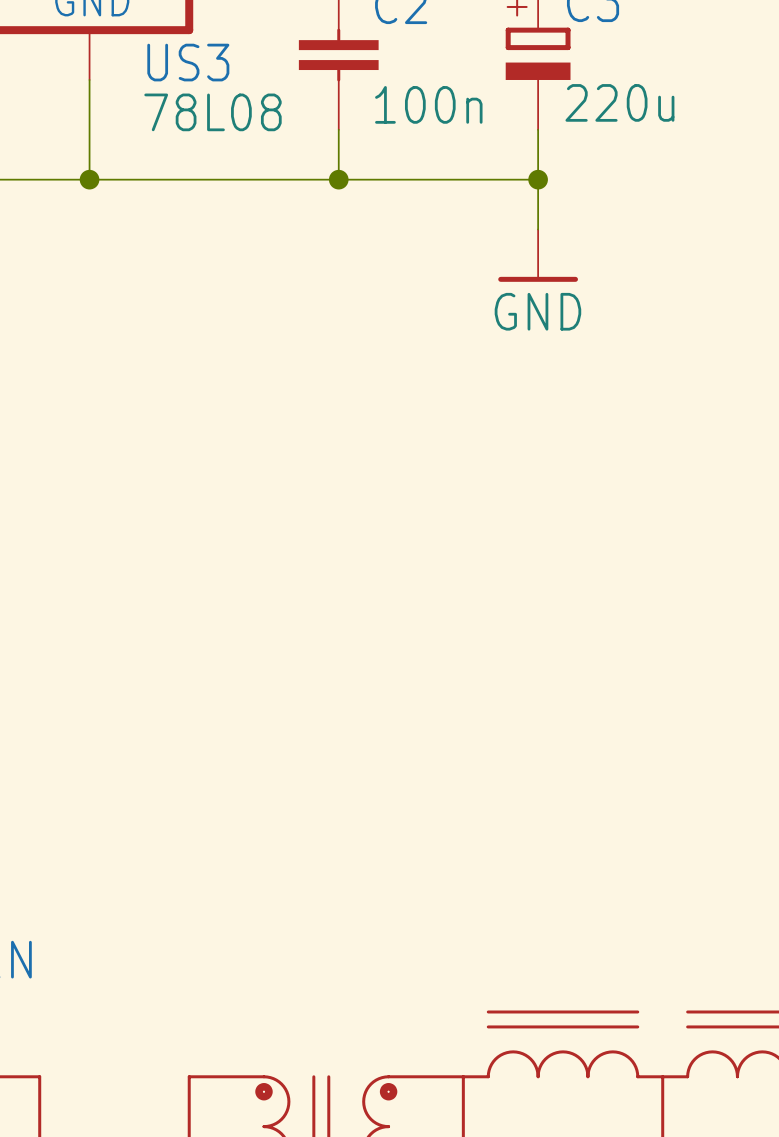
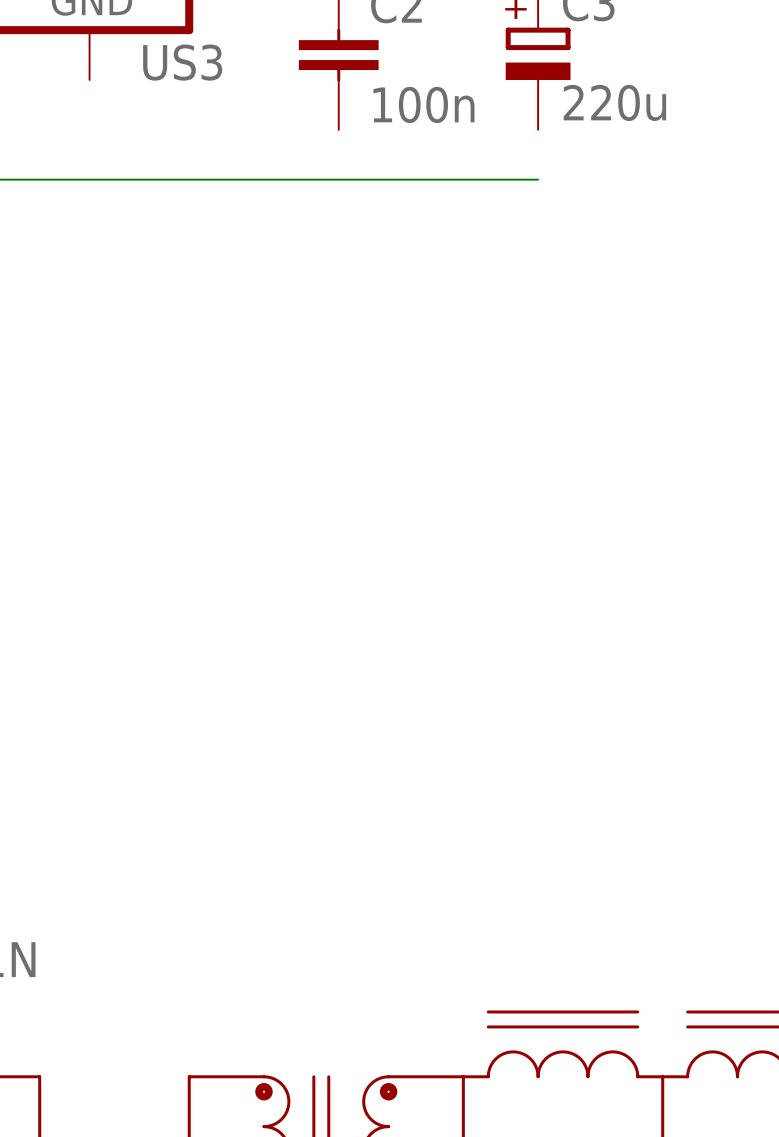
wire: (89, 79) (89, 179) -> none
US3 value: 78L08 (213, 112) -> none
wire: (338, 129) (338, 179) -> none
wire: (538, 129) (538, 229) -> none
junction: (89, 179) -> none
junction: (338, 179) -> none
junction: (538, 179) -> none
power symbol: GND (538, 255) -> none

